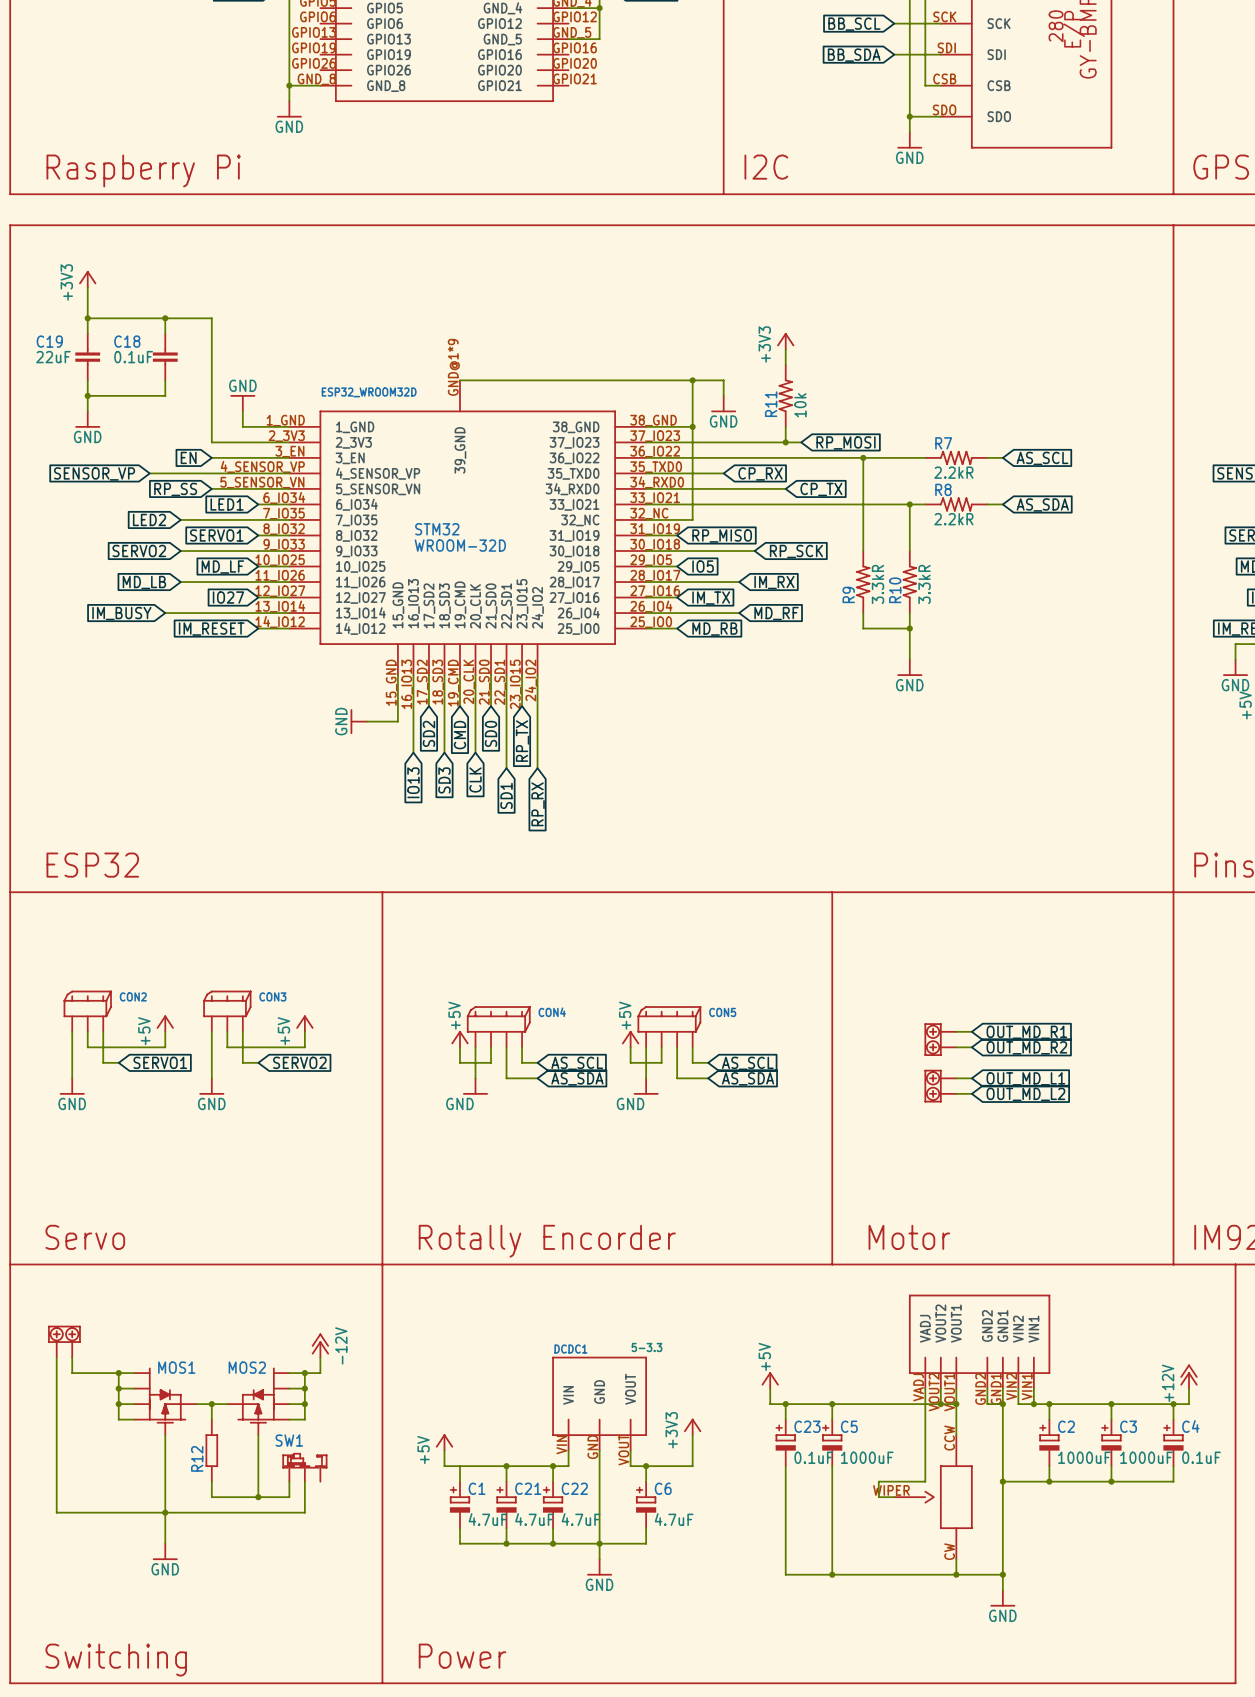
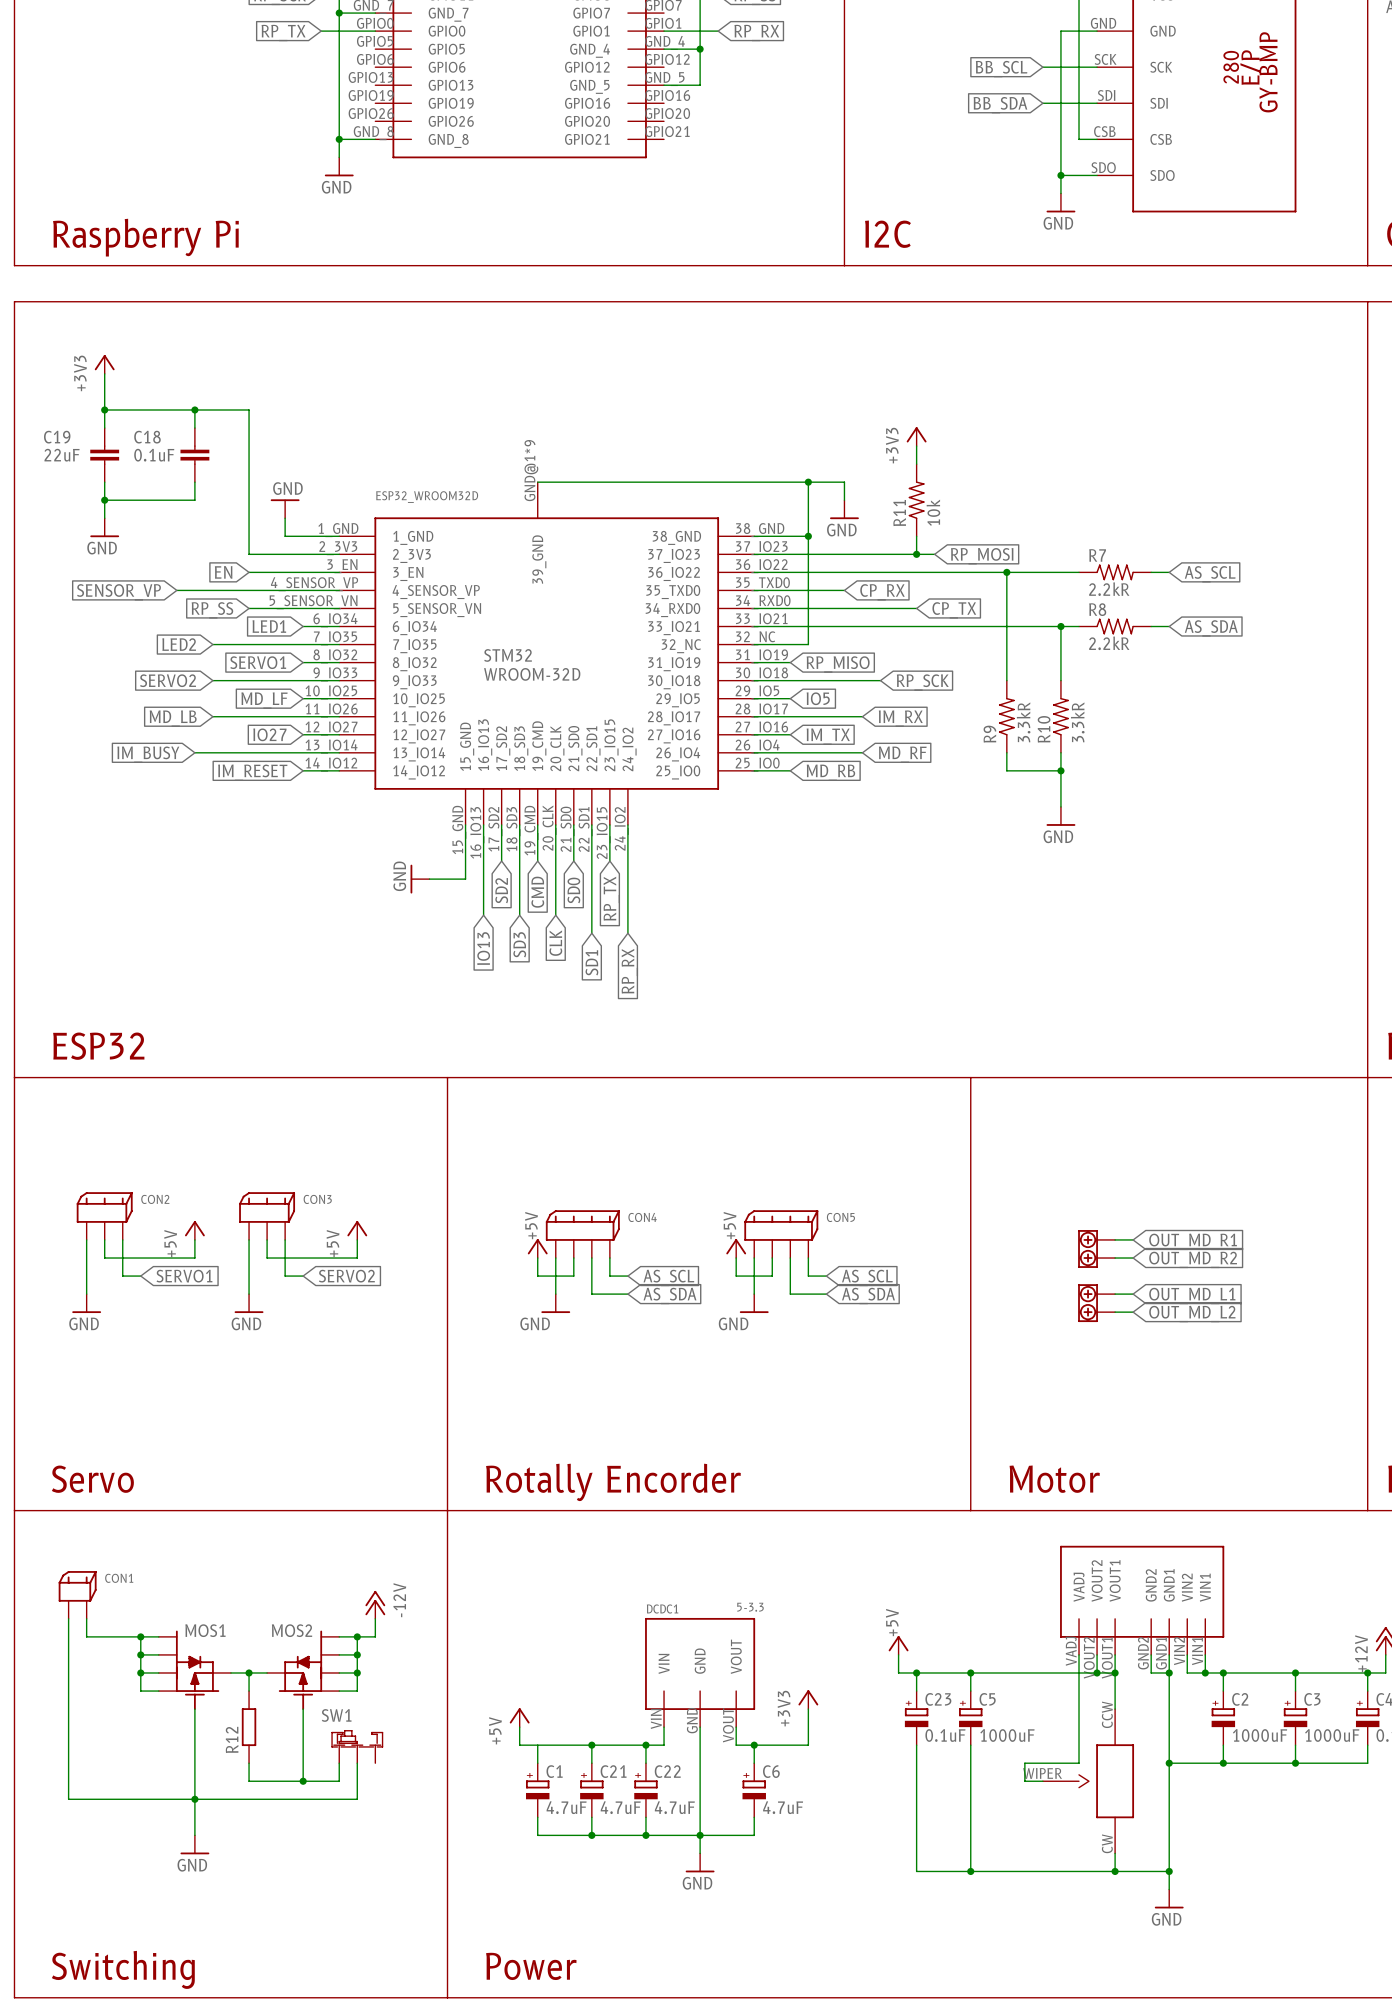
CON1: none -> (77, 1594)
part: (64, 1341) -> none

